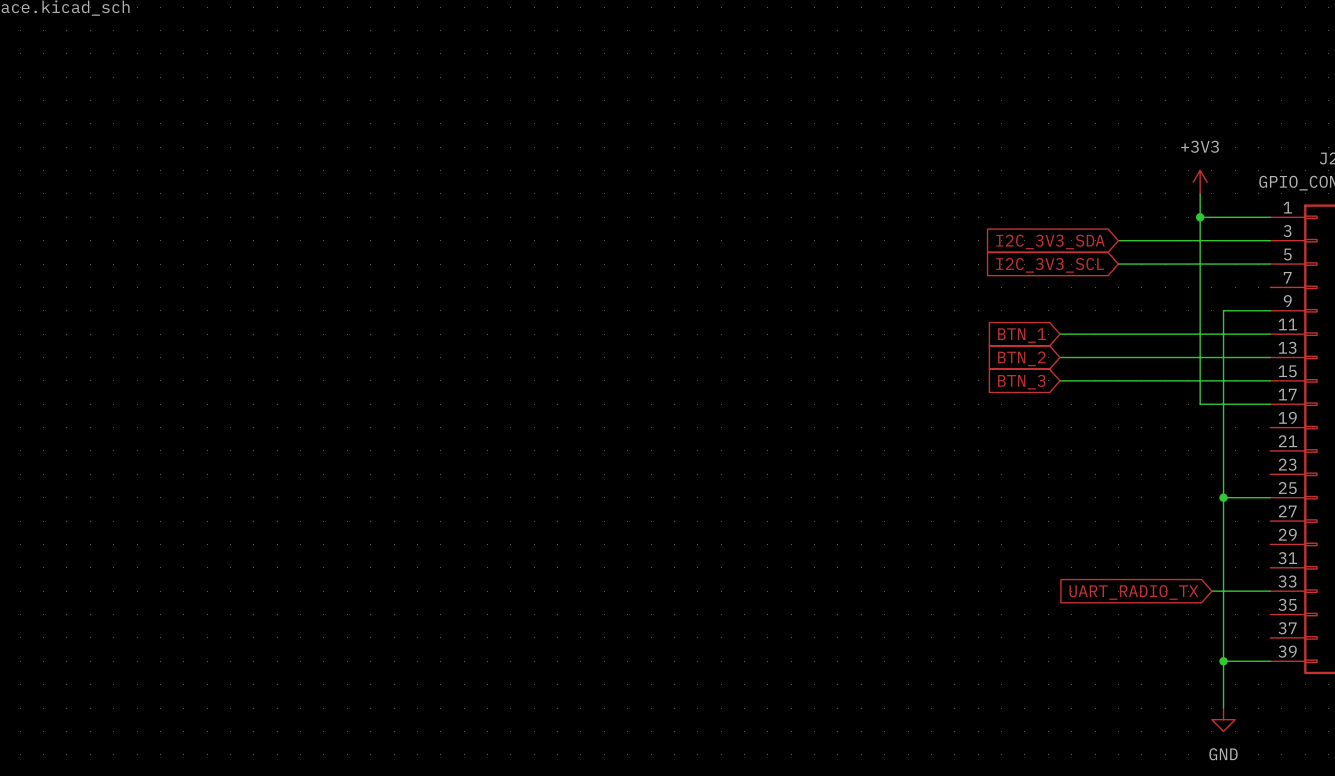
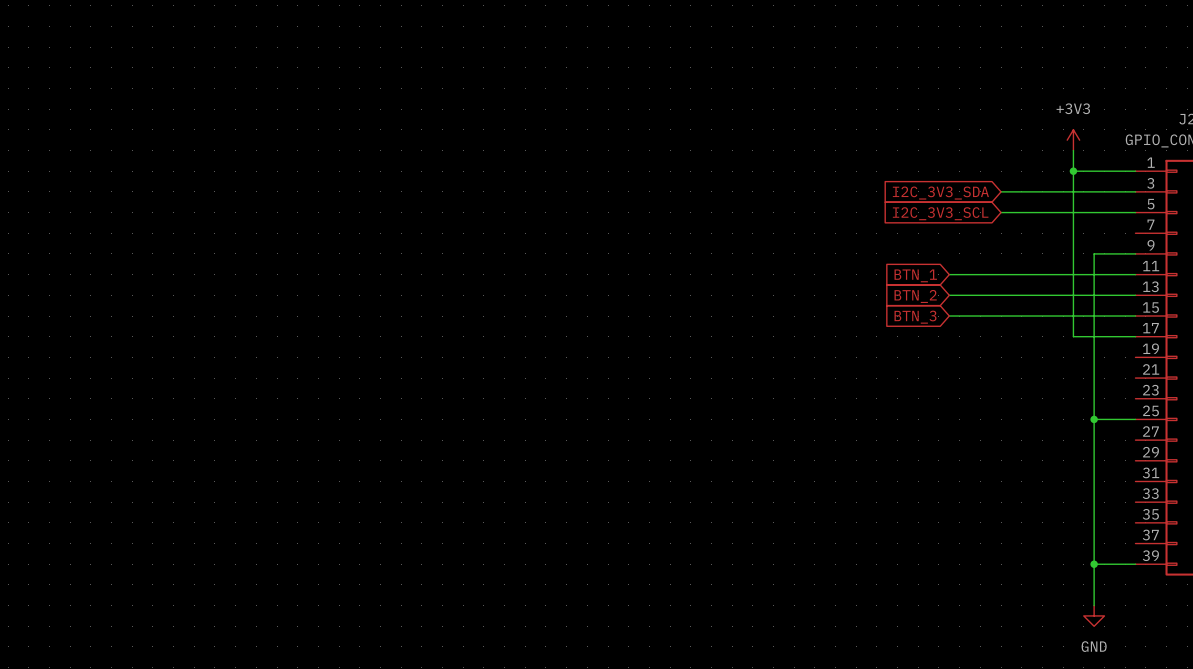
wire: (1211, 591) (1270, 591) -> none
global label: UART_RADIO_TX (1133, 592) -> none

